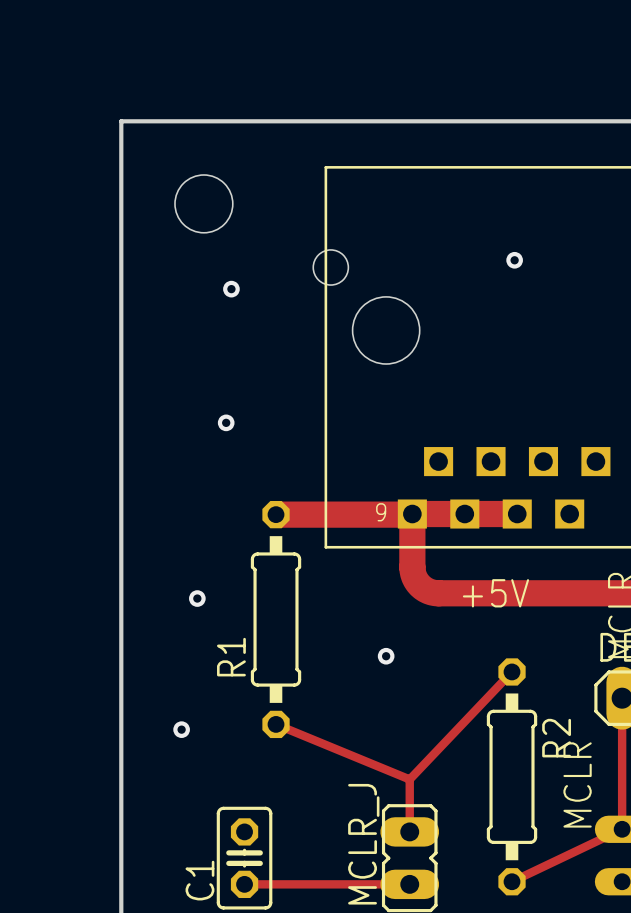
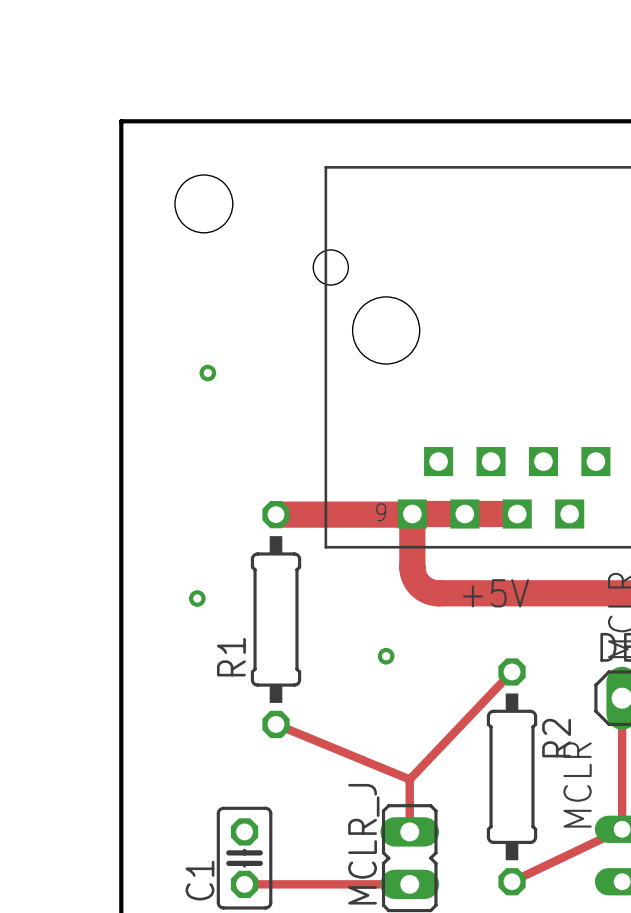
via: (514, 260) -> none
via: (231, 289) -> none
via: none -> (207, 373)
via: (226, 422) -> none
via: (181, 729) -> none

